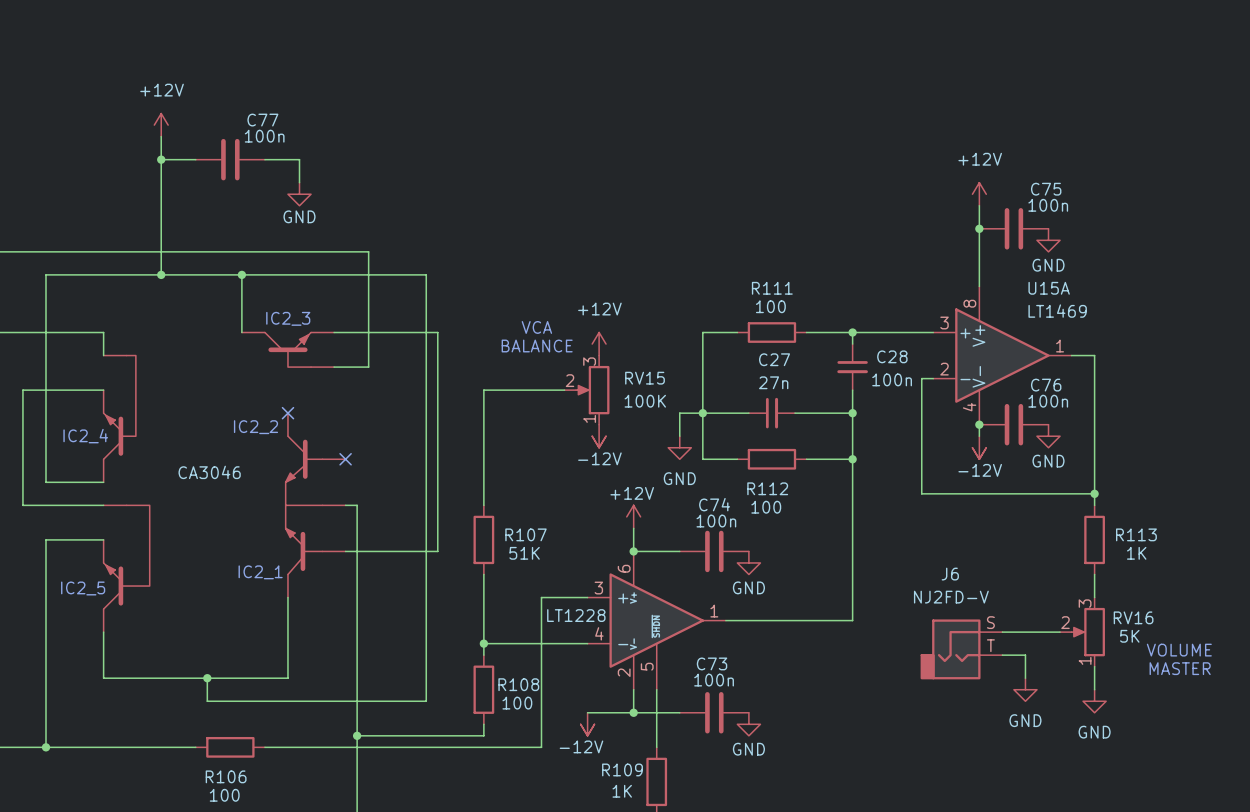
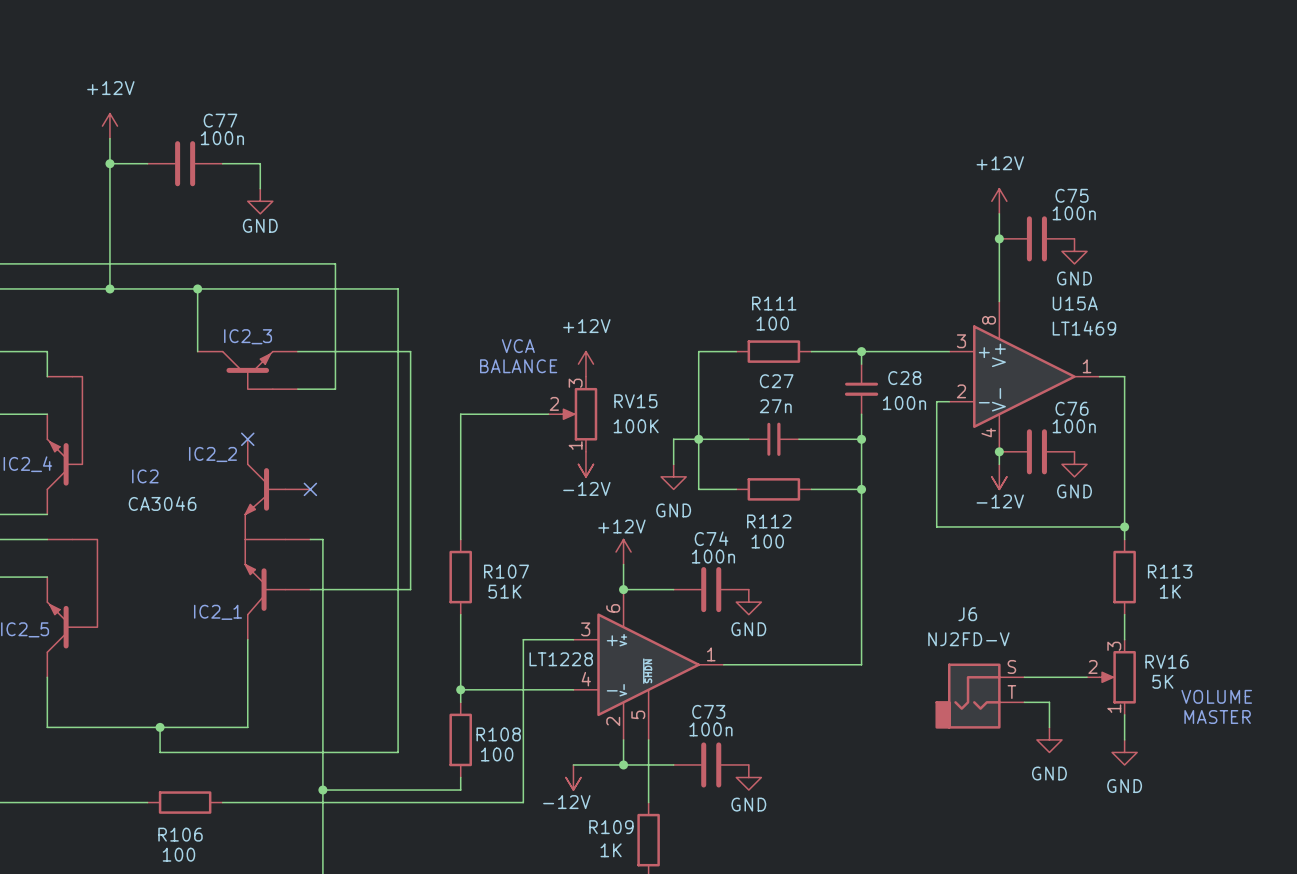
text: none -> IC2 (145, 476)

